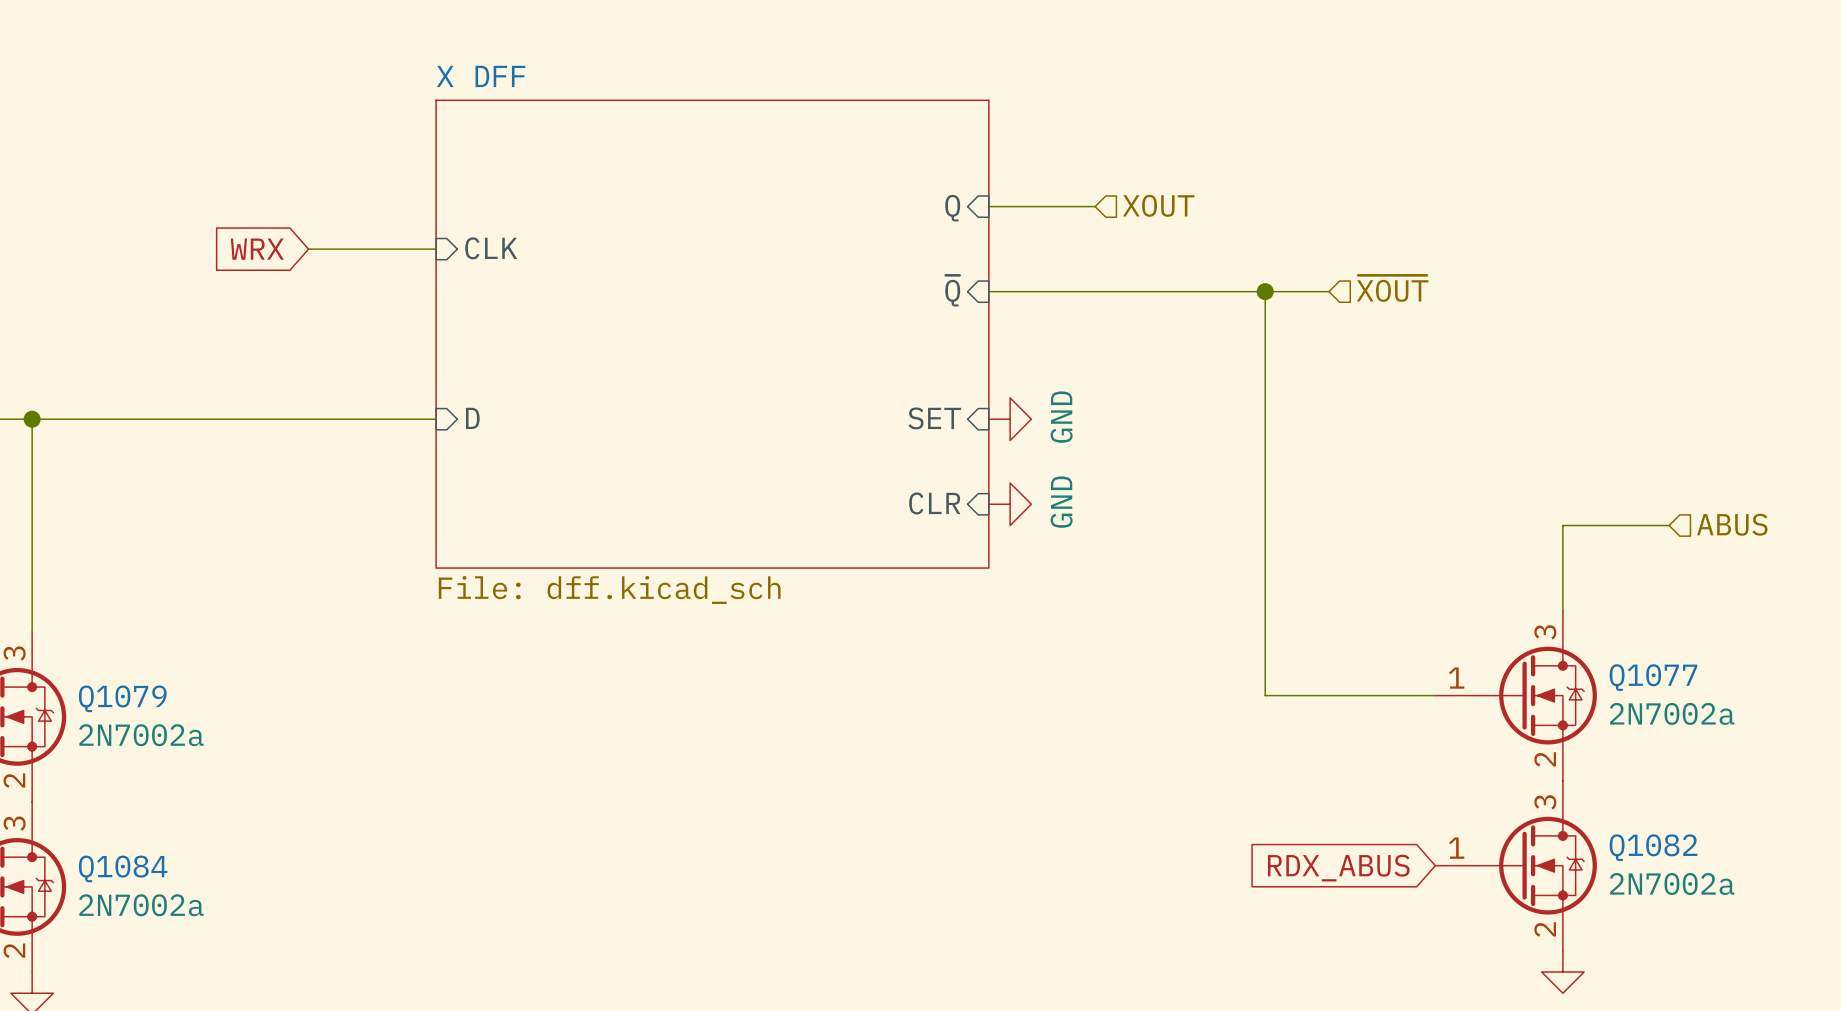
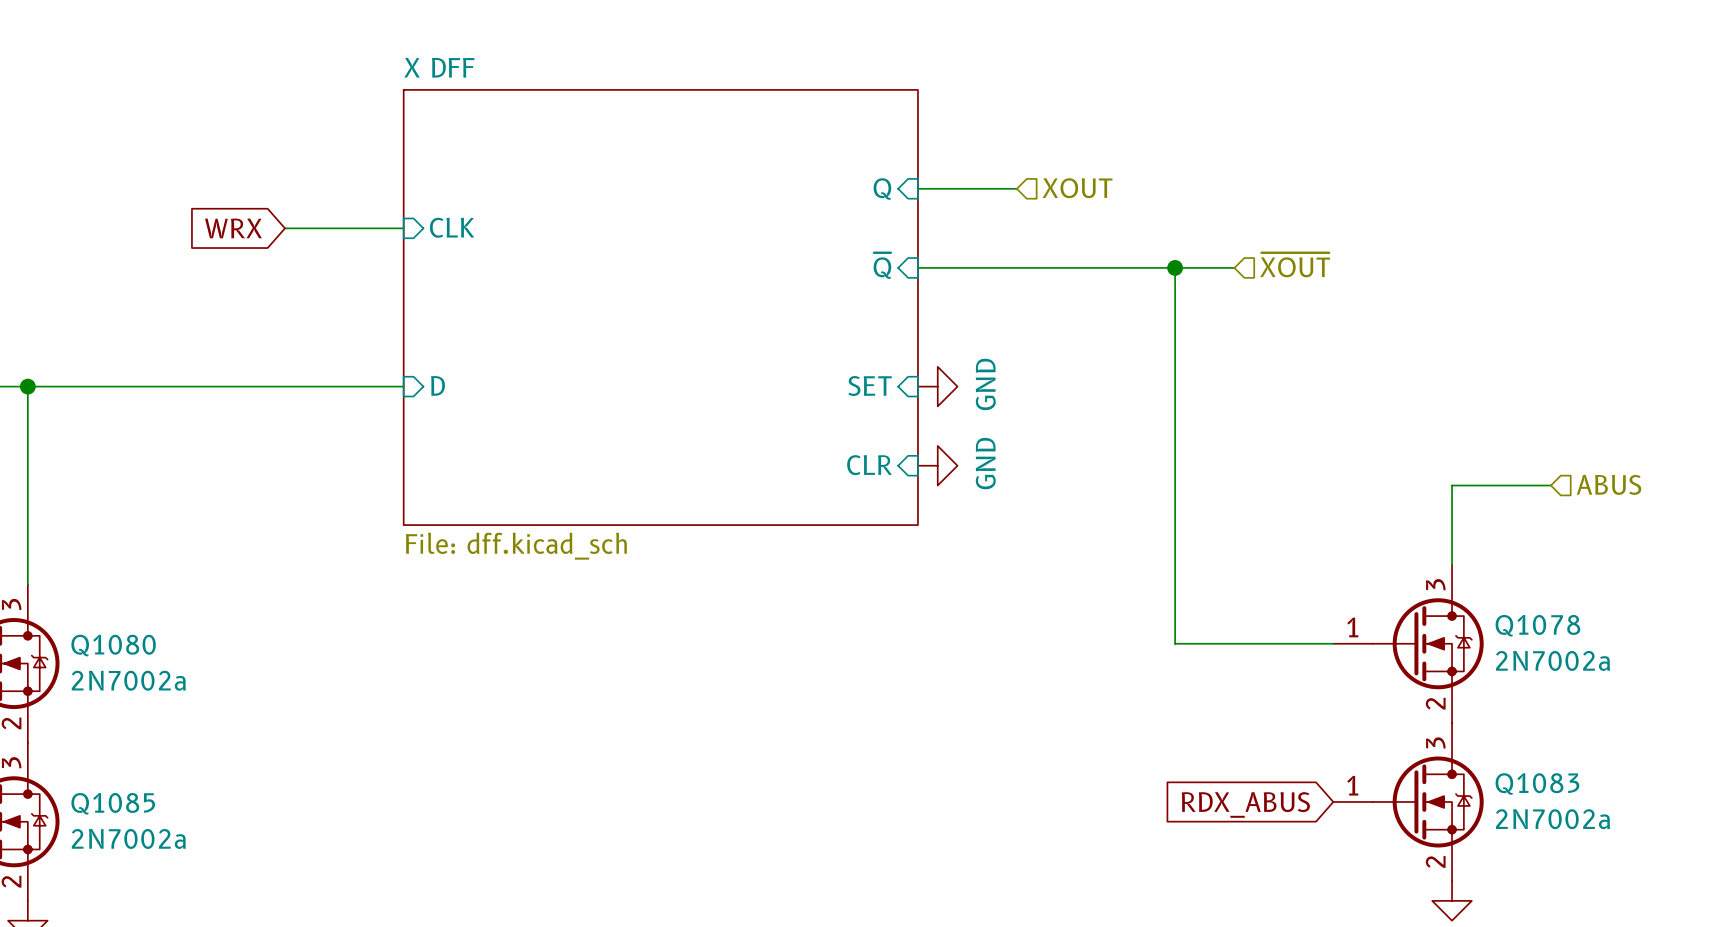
Q1077 name: Q1077 (1653, 677) -> Q1078 (1537, 625)
Q1079 name: Q1079 (122, 698) -> Q1080 (113, 645)
Q1082 name: Q1082 (1653, 847) -> Q1083 (1537, 784)
Q1084 name: Q1084 (123, 868) -> Q1085 (113, 803)

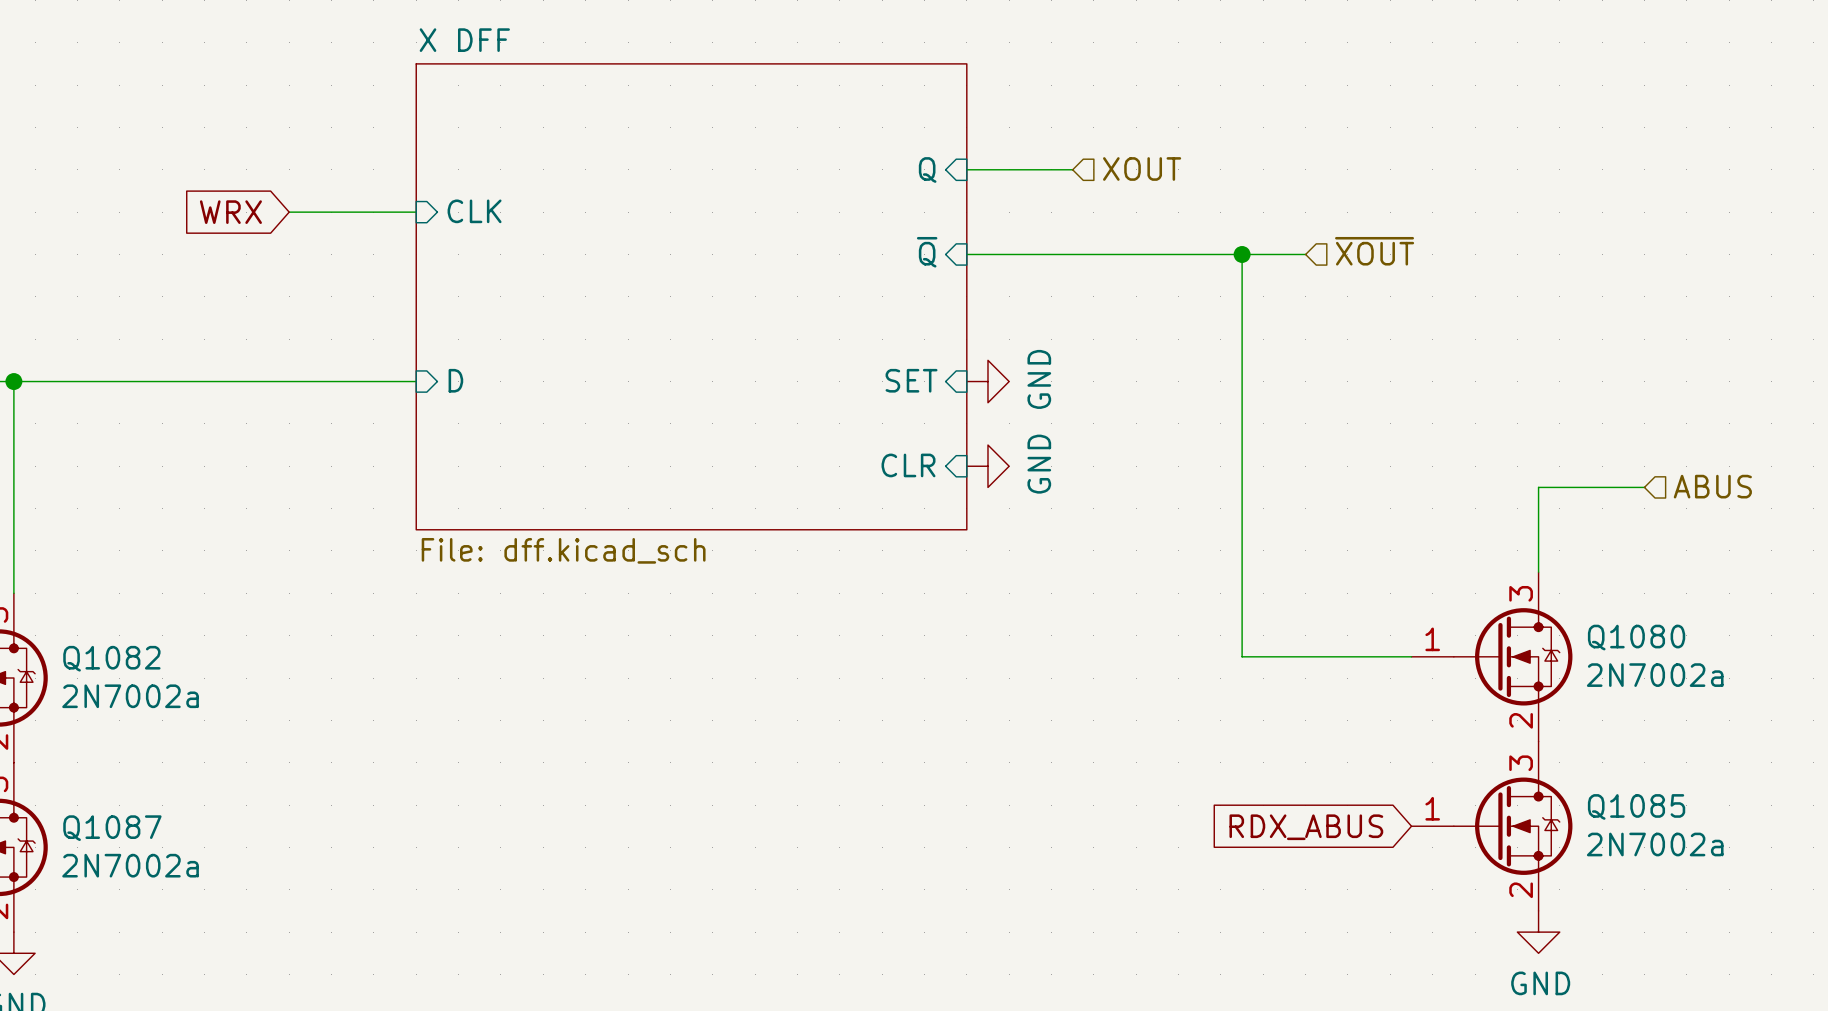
Q1078 name: Q1078 (1537, 625) -> Q1080 (1636, 637)
Q1080 name: Q1080 (113, 645) -> Q1082 (111, 658)
Q1083 name: Q1083 (1537, 784) -> Q1085 (1636, 806)
Q1085 name: Q1085 (113, 803) -> Q1087 (112, 828)

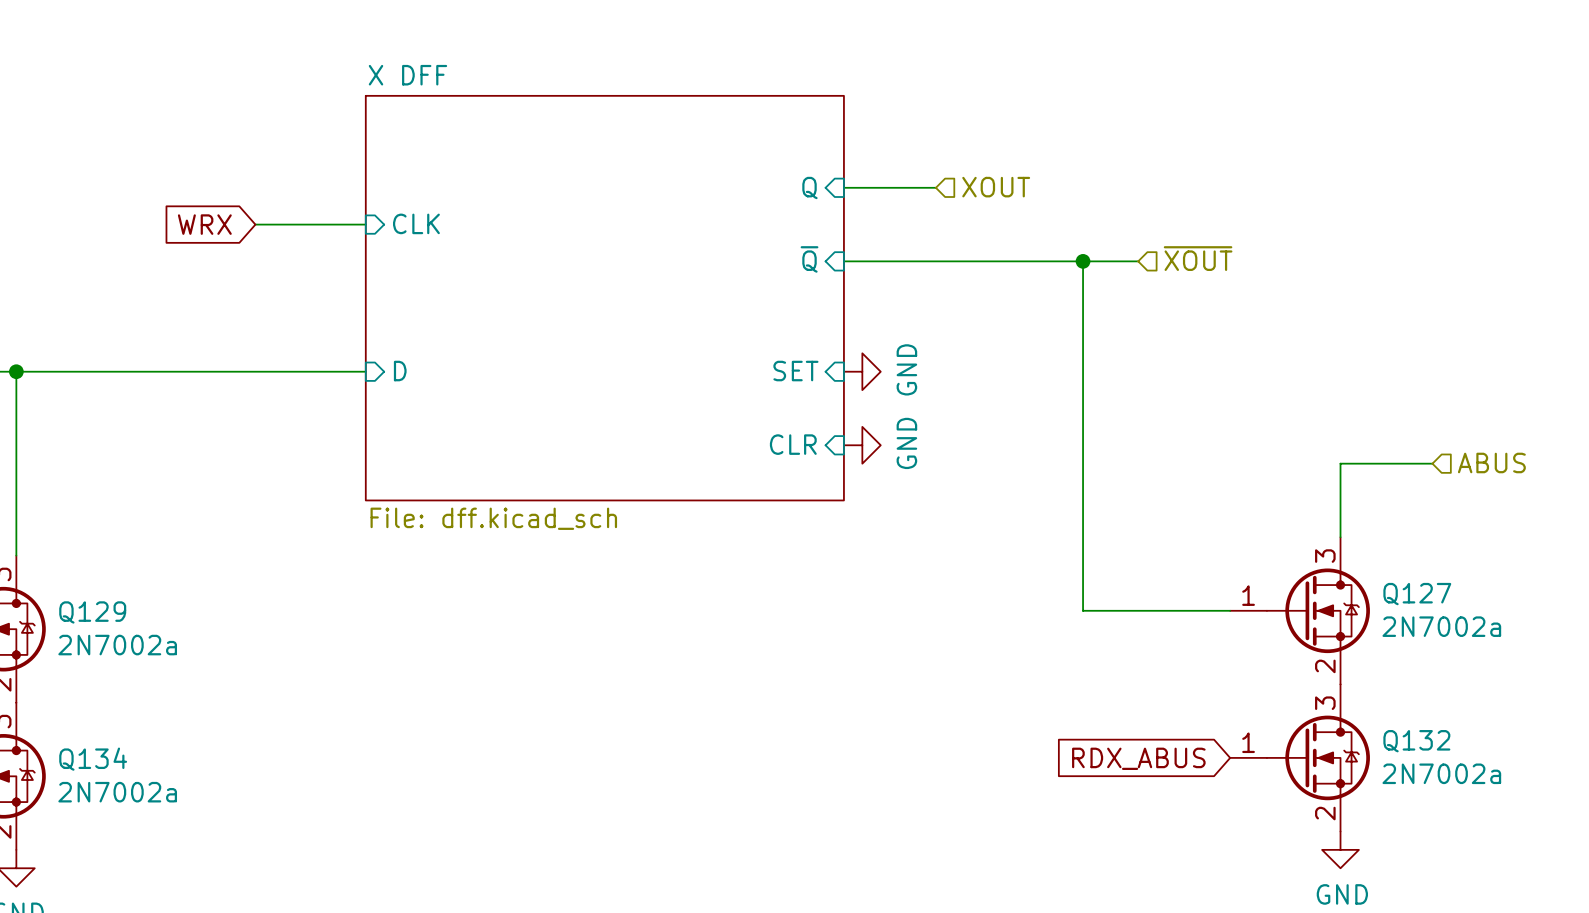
Q1080 name: Q1080 (1636, 637) -> Q127 (1417, 594)
Q1082 name: Q1082 (111, 658) -> Q129 (92, 612)
Q1085 name: Q1085 (1636, 806) -> Q132 (1416, 741)
Q1087 name: Q1087 (112, 828) -> Q134 (93, 759)

